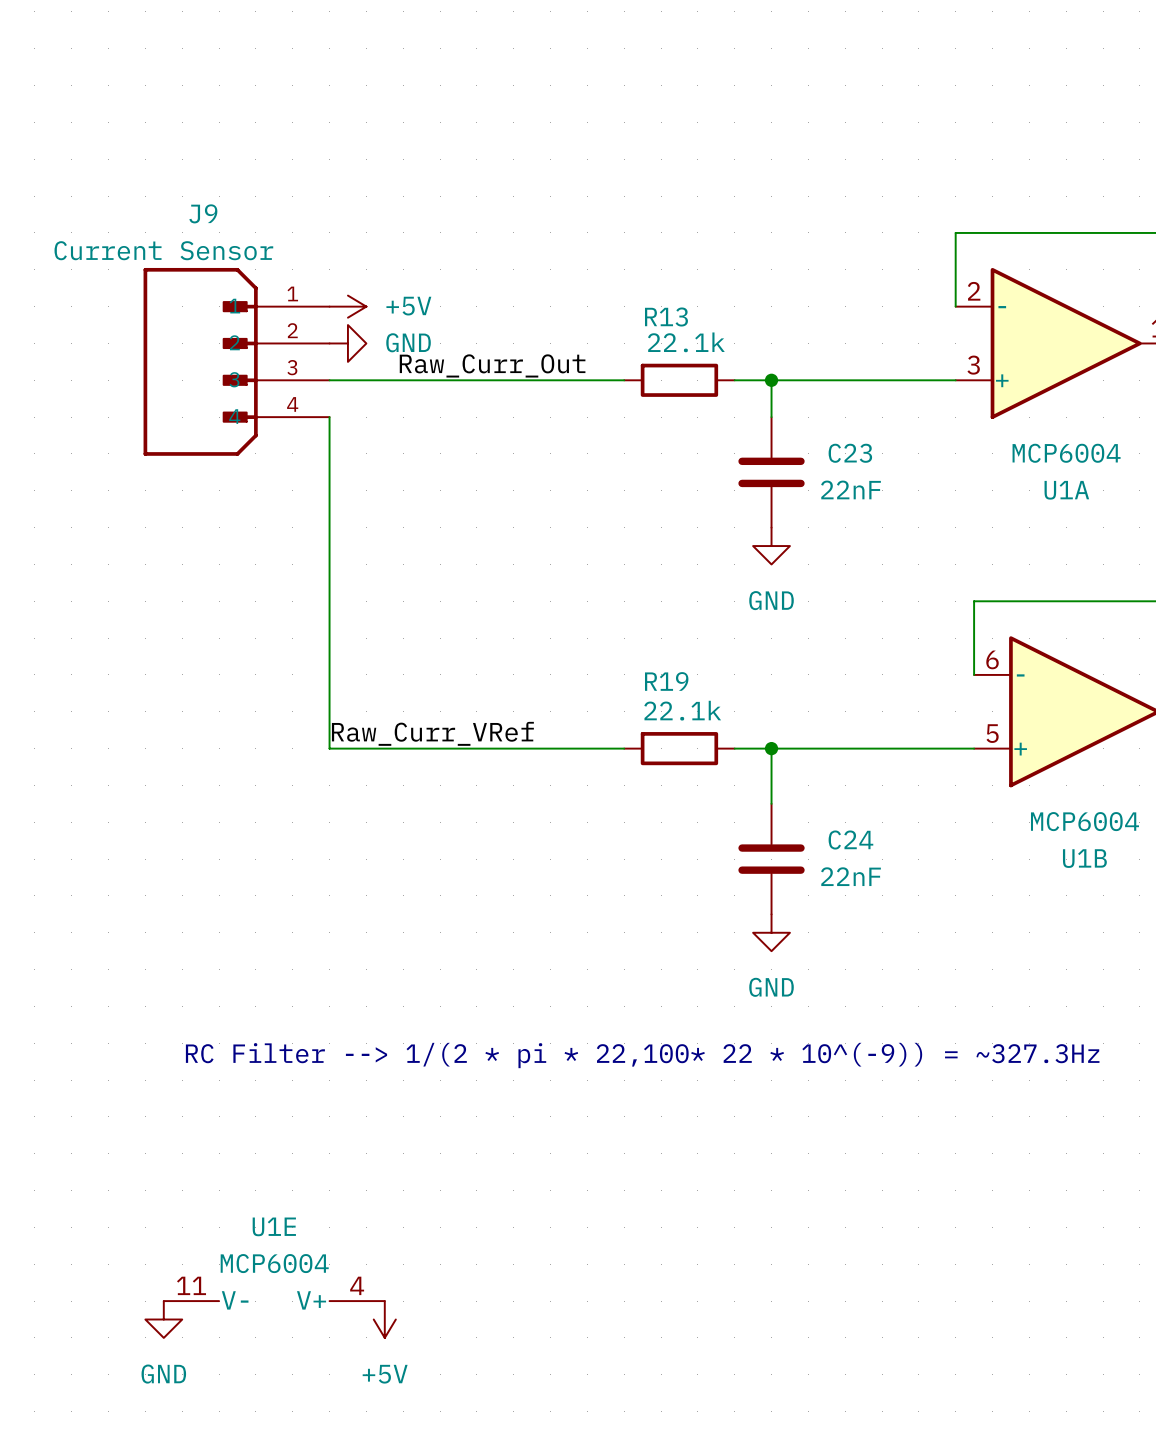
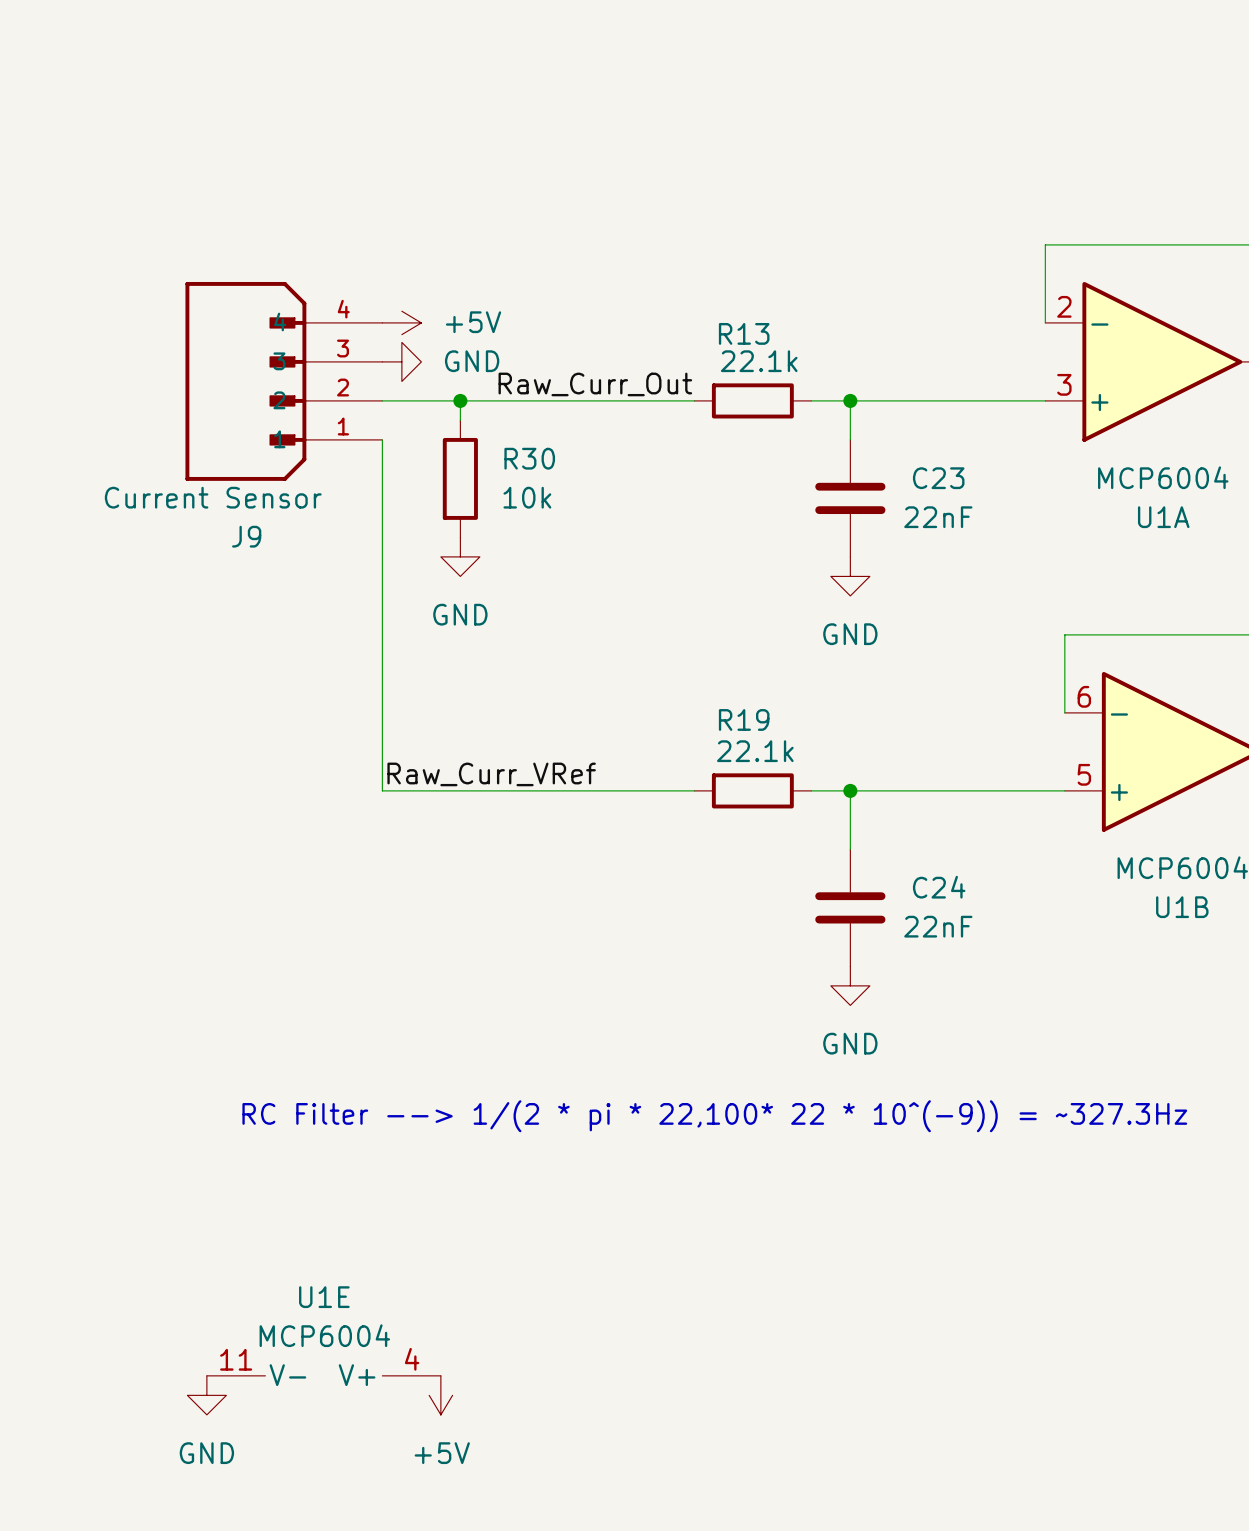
J9 flip: as is (200, 361) -> up-down (245, 381)
label position: Raw_Curr_Out (492, 365) -> Raw_Curr_Out (595, 384)
wire: none -> (460, 400) (460, 420)
junction: none -> (460, 400)
R30: none -> 10k (460, 478)
power symbol: none -> GND (460, 556)

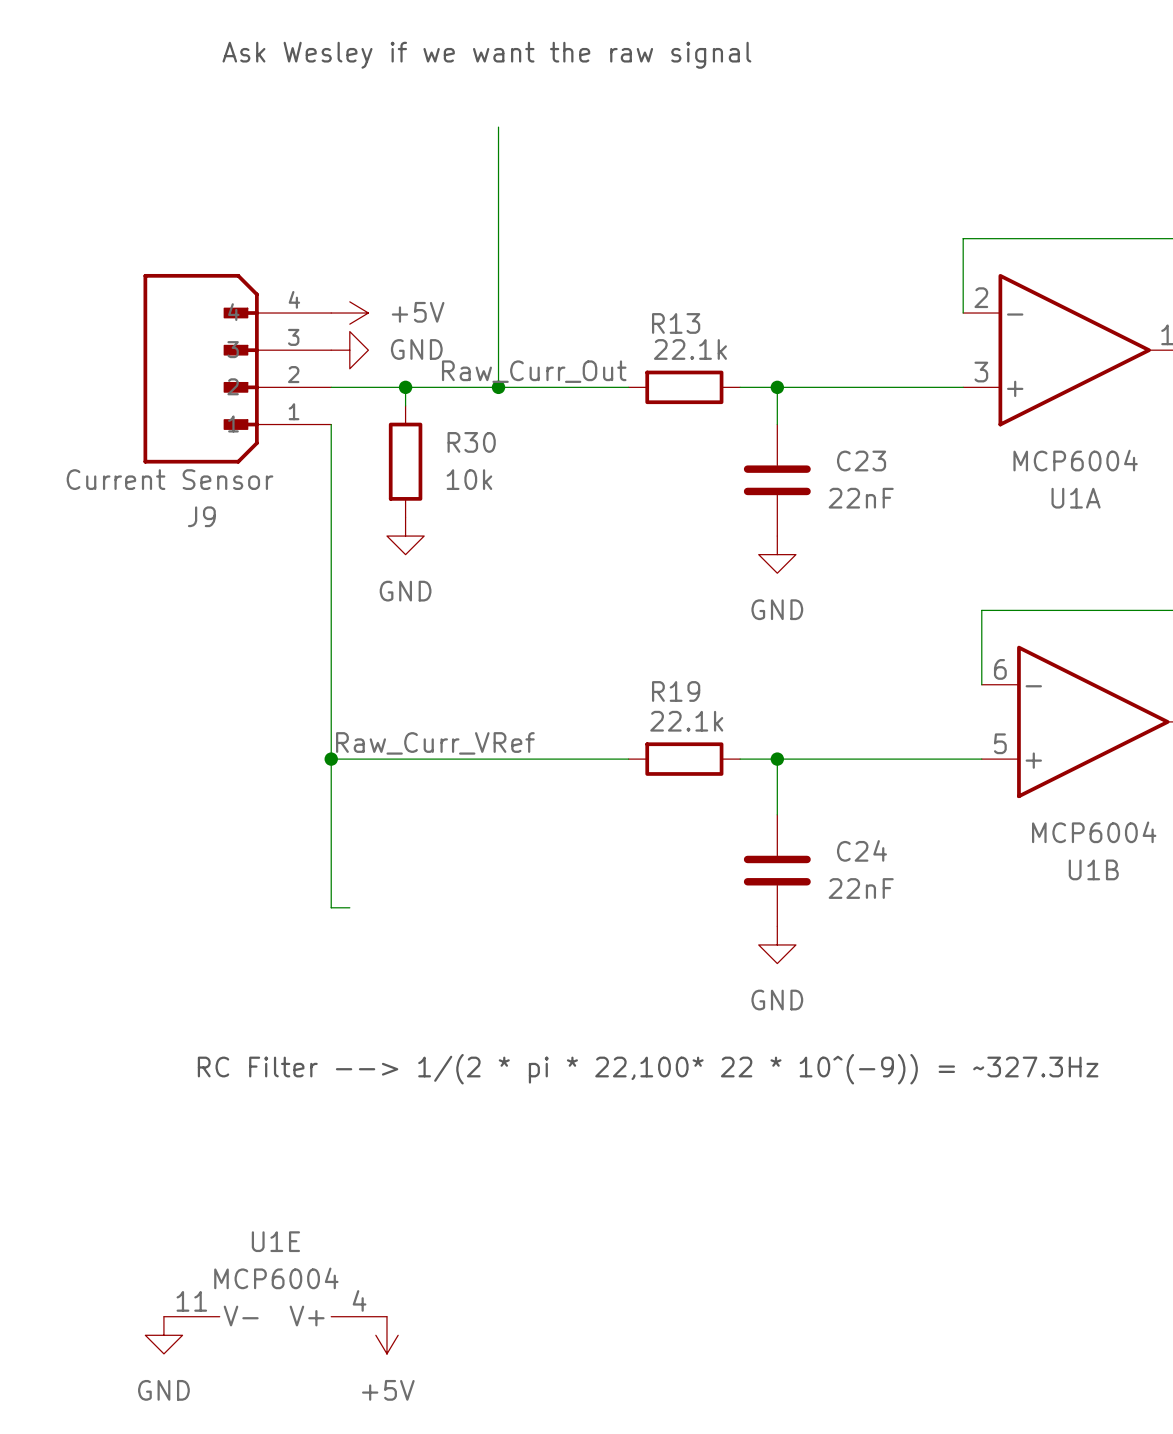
text: none -> Ask Wesley if we want the raw signal (486, 55)
wire: none -> (498, 127) (498, 387)
junction: none -> (498, 387)
wire: none -> (331, 759) (331, 907) (349, 907)
junction: none -> (331, 759)

